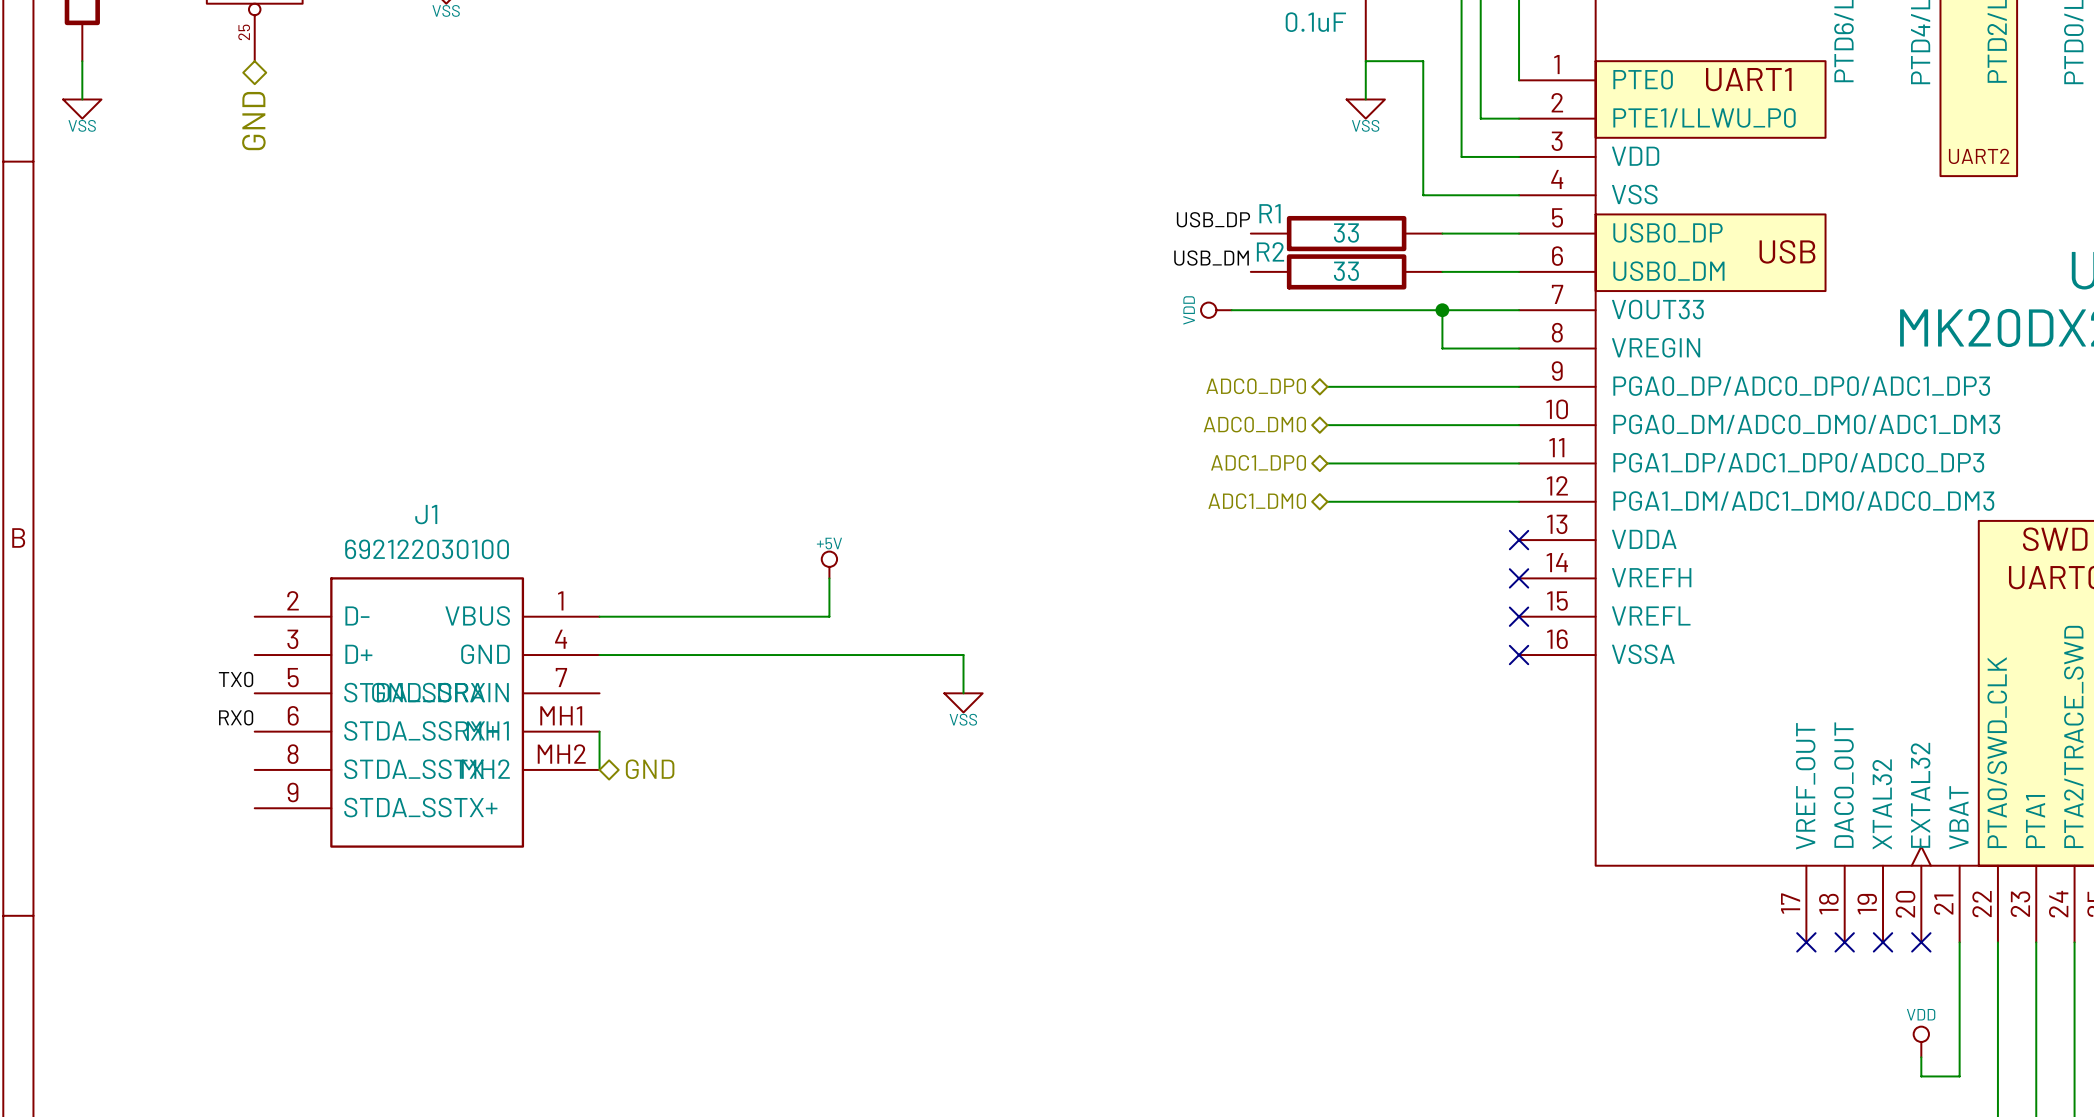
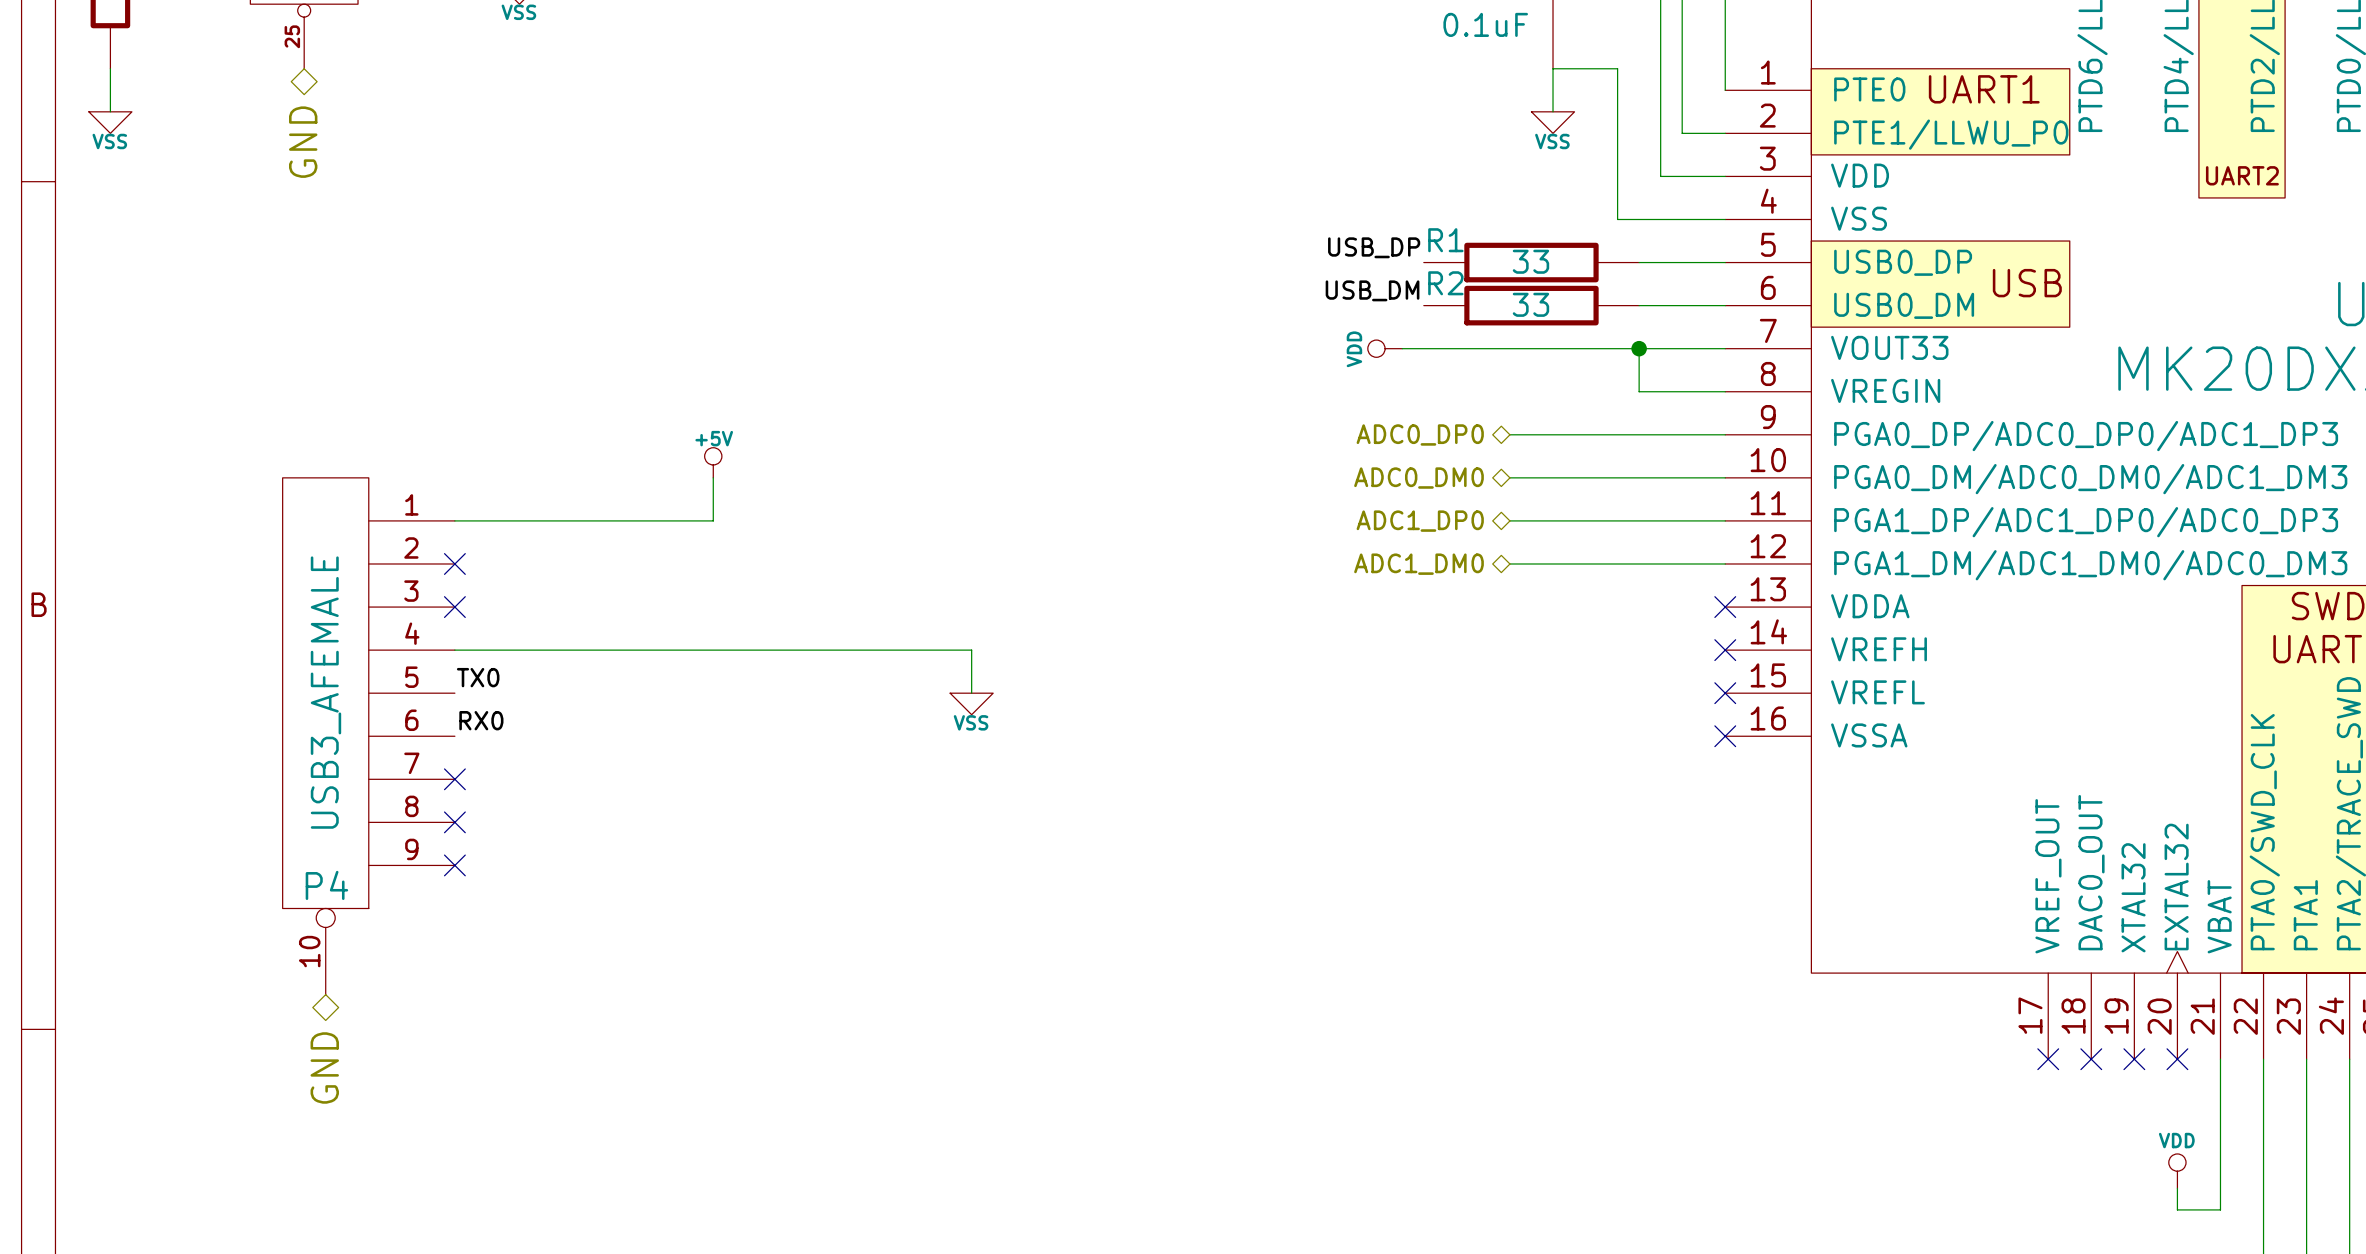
no-connect mark: none -> (454, 563)
no-connect mark: none -> (454, 607)
power symbol position: +5V (829, 564) -> +5V (713, 462)
wire: none -> (454, 650) (971, 650) (971, 693)
wire: (829, 578) (829, 616) (599, 616) -> (713, 477) (713, 520) (454, 520)
P4: none -> USB3_AFEMALE (368, 736)
wire: (599, 655) (963, 655) (963, 693) -> none
label position: TX0 (236, 679) -> TX0 (478, 677)
no-connect mark: none -> (454, 779)
power symbol position: VSS (963, 702) -> VSS (971, 703)
J1: 692122030100 (427, 712) -> none
label position: RX0 (236, 717) -> RX0 (481, 720)
no-connect mark: none -> (454, 822)
wire: (599, 731) (599, 769) -> none
no-connect mark: none -> (454, 865)
hierarchical label: GND (650, 769) -> none
hierarchical label: none -> GND (324, 1067)

